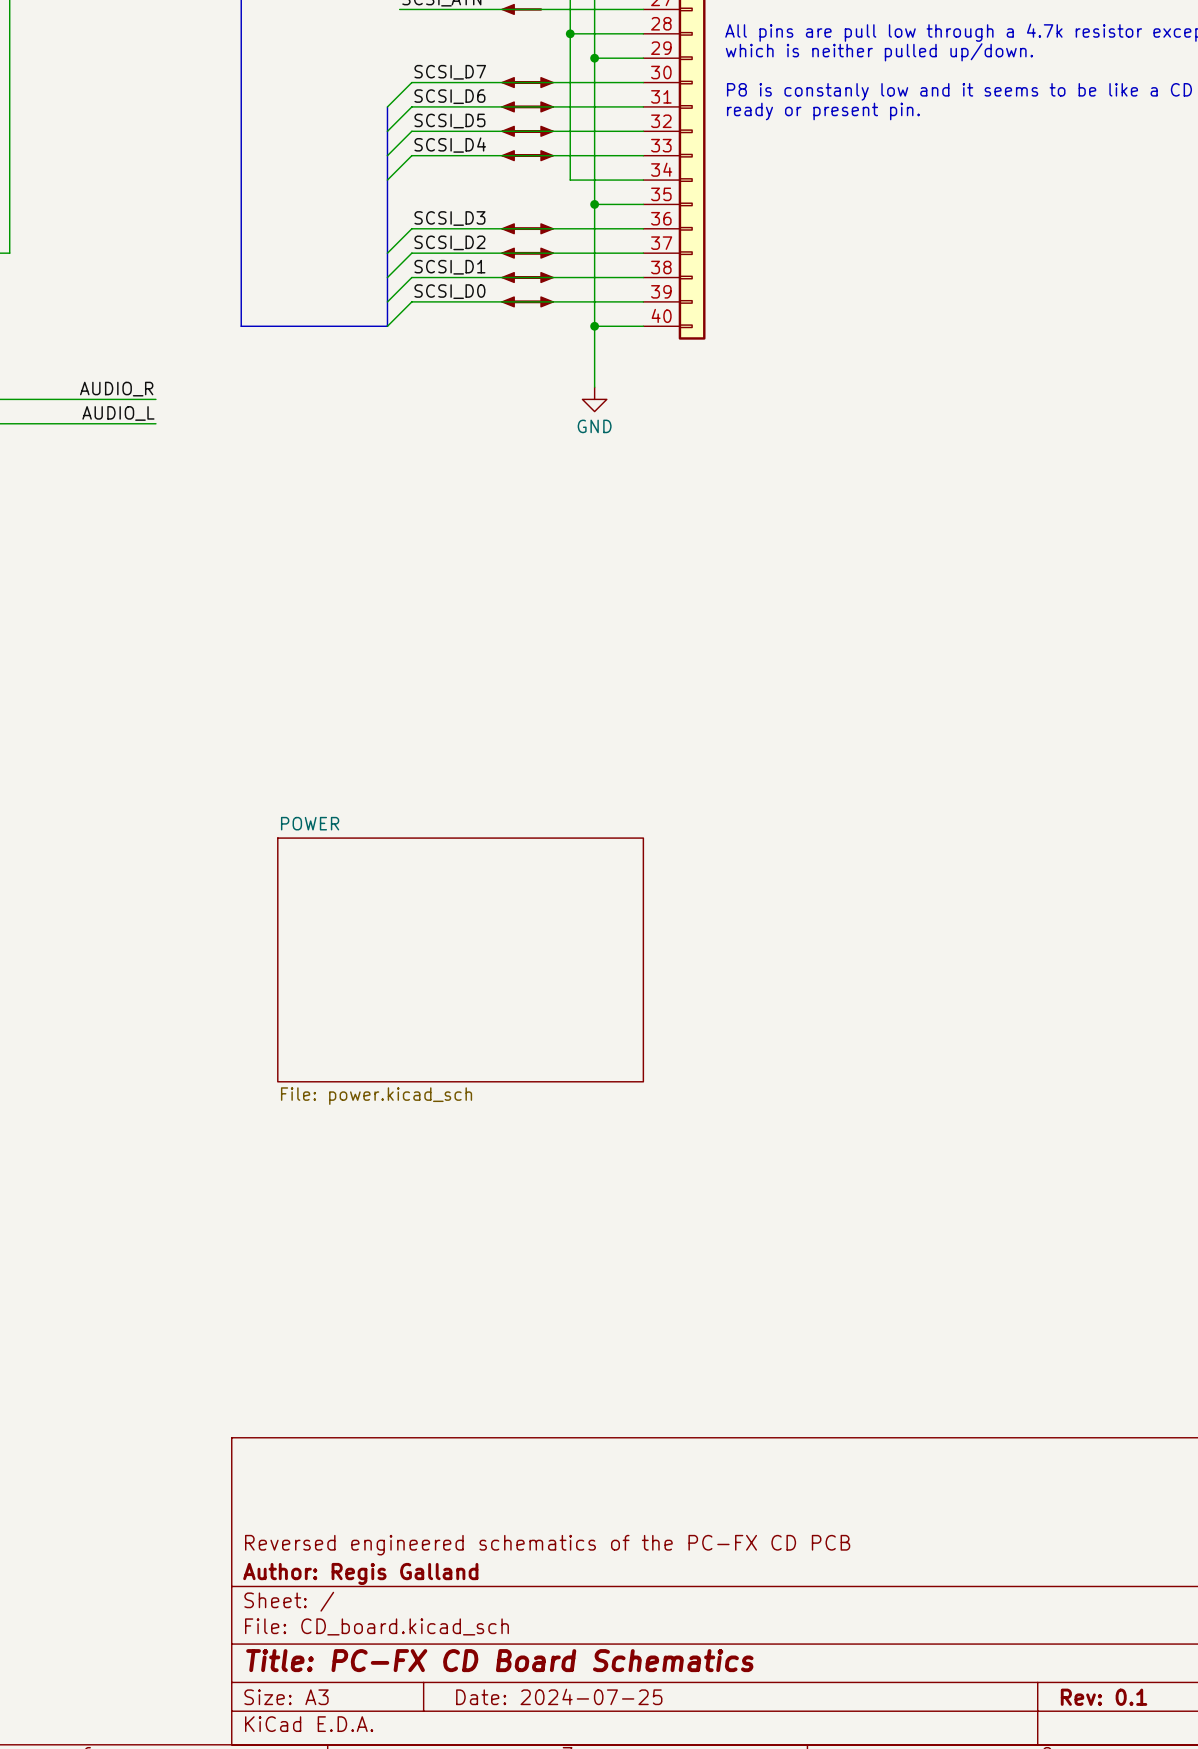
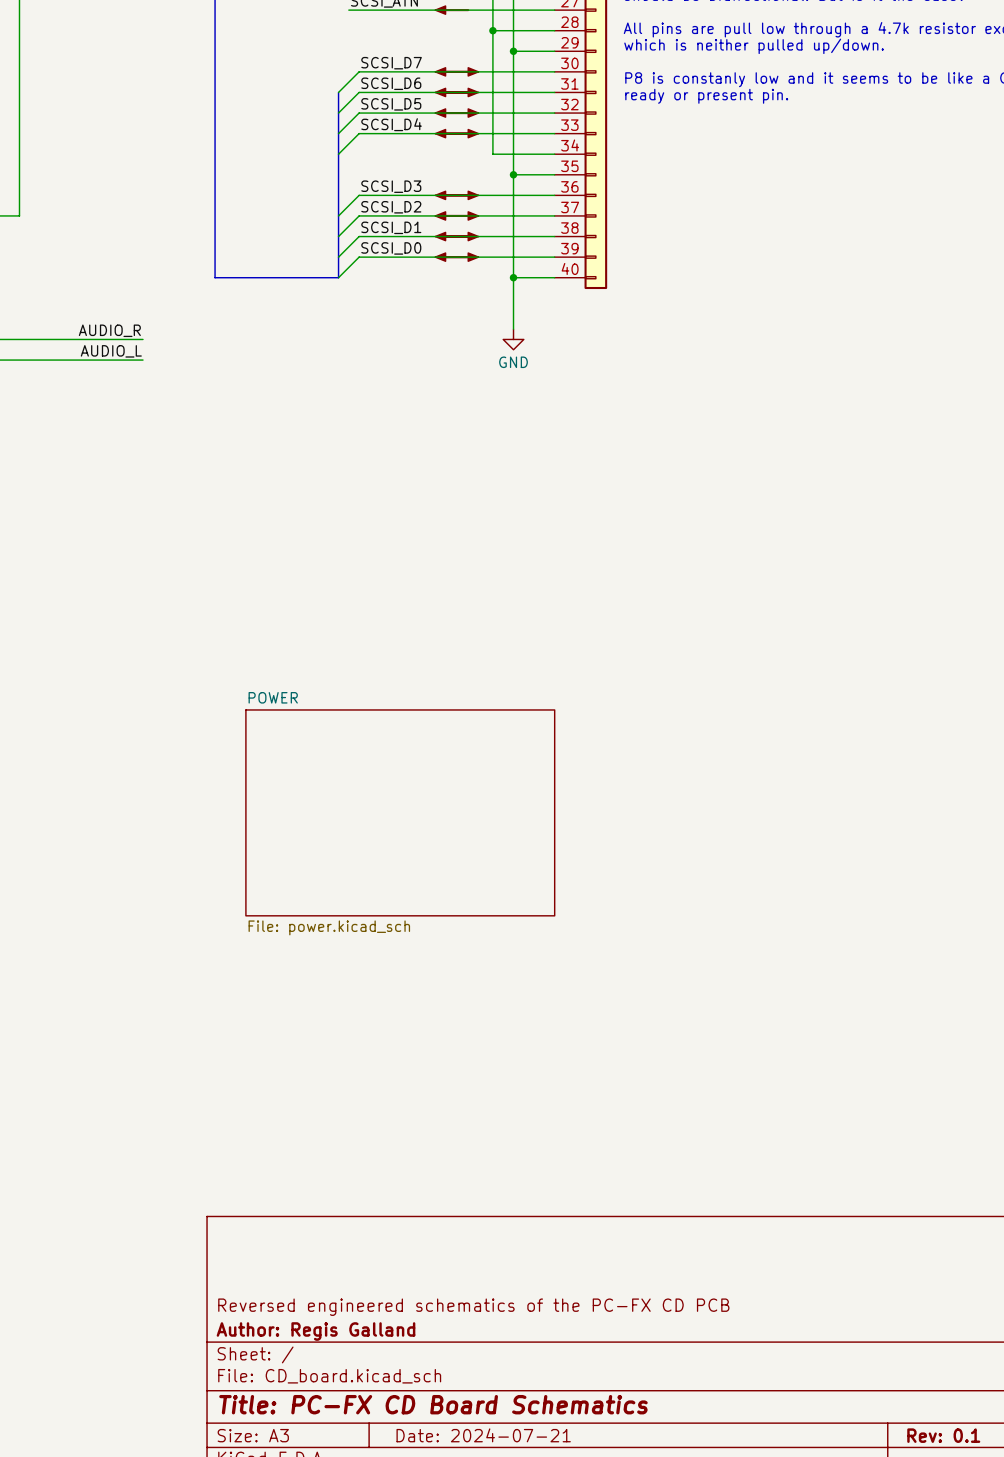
title block: Date: 2024-07-25 (559, 1696) -> Date: 2024-07-21 (483, 1435)

